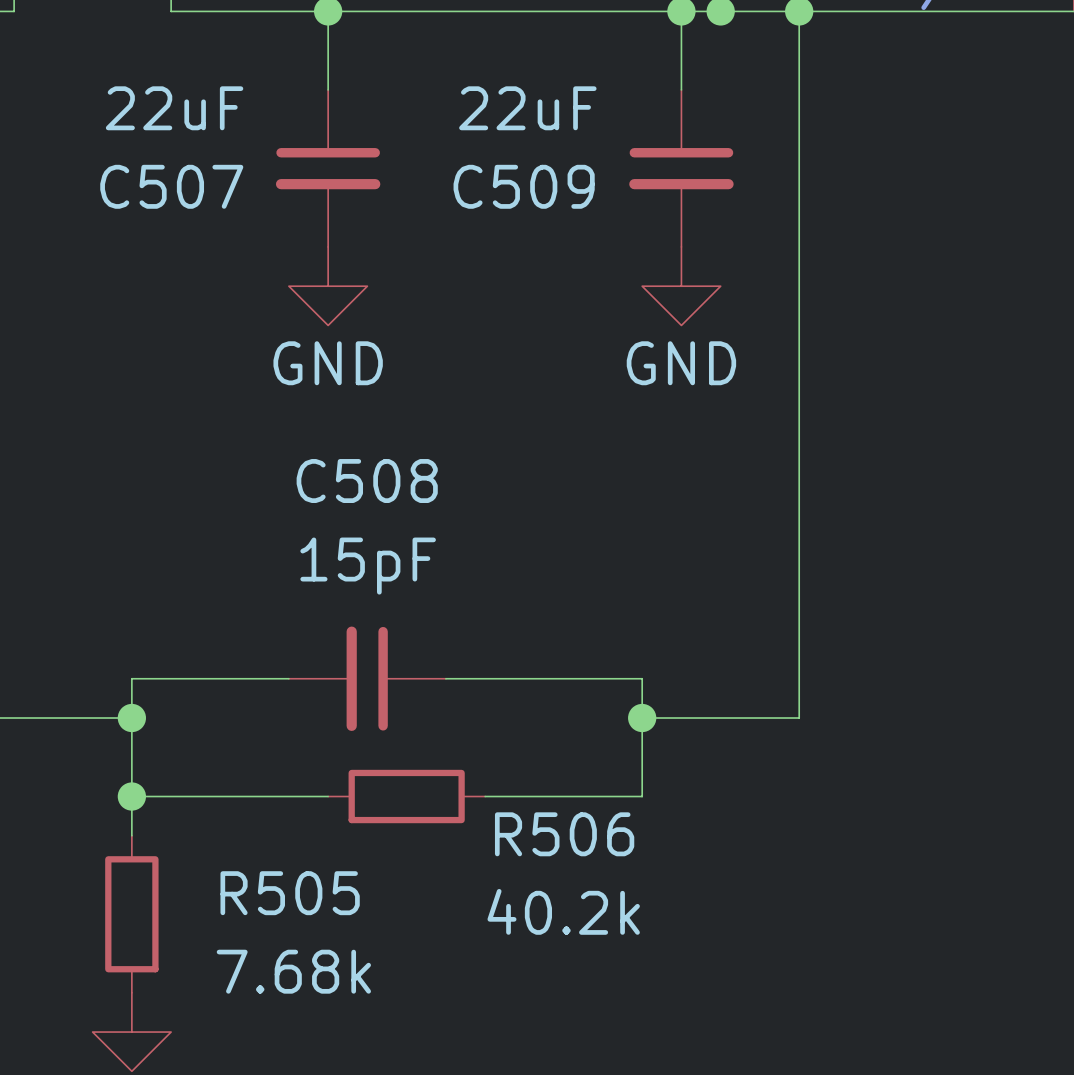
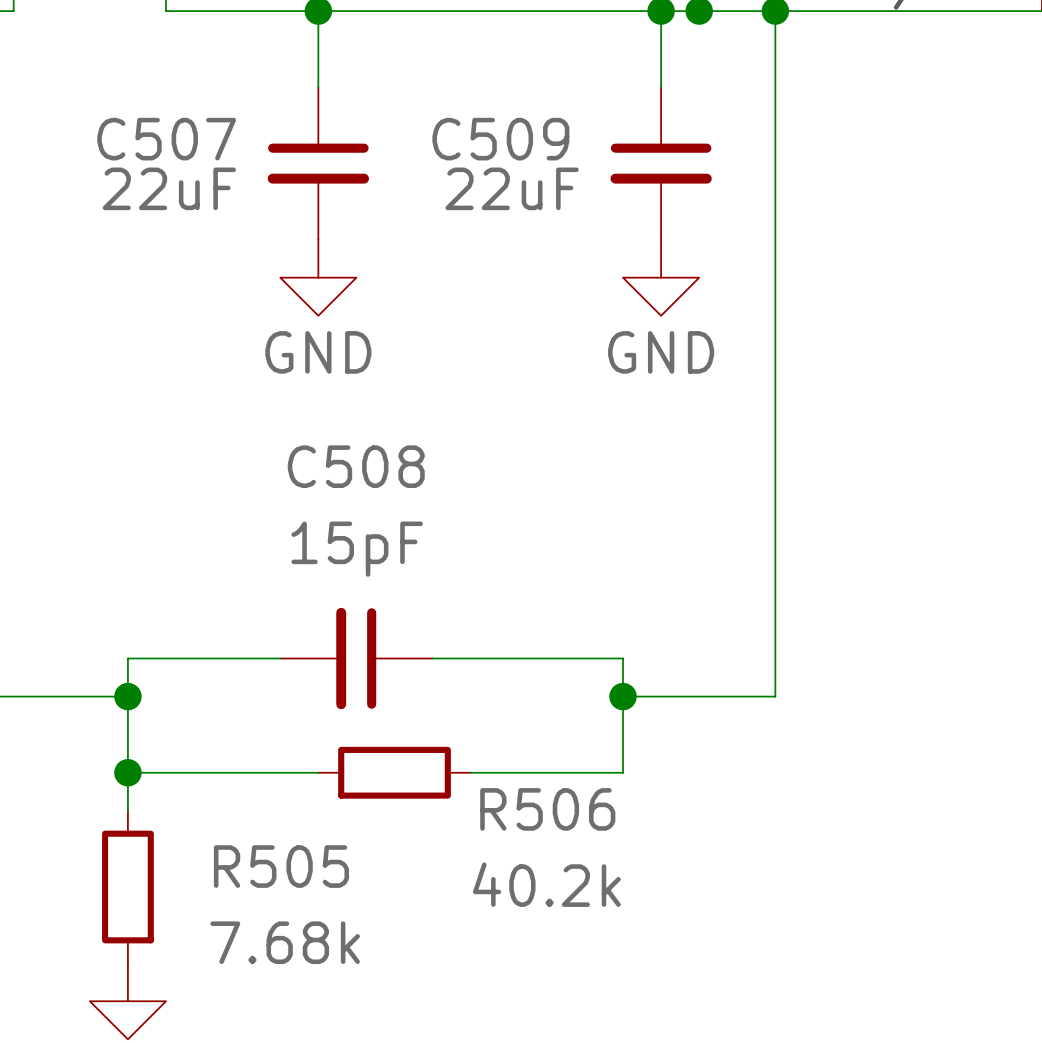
C507 value position: 22uF (174, 108) -> 22uF (169, 188)
C509 value position: 22uF (527, 108) -> 22uF (512, 188)
C507 name position: C507 (171, 186) -> C507 (166, 139)
C509 name position: C509 (524, 186) -> C509 (500, 139)

